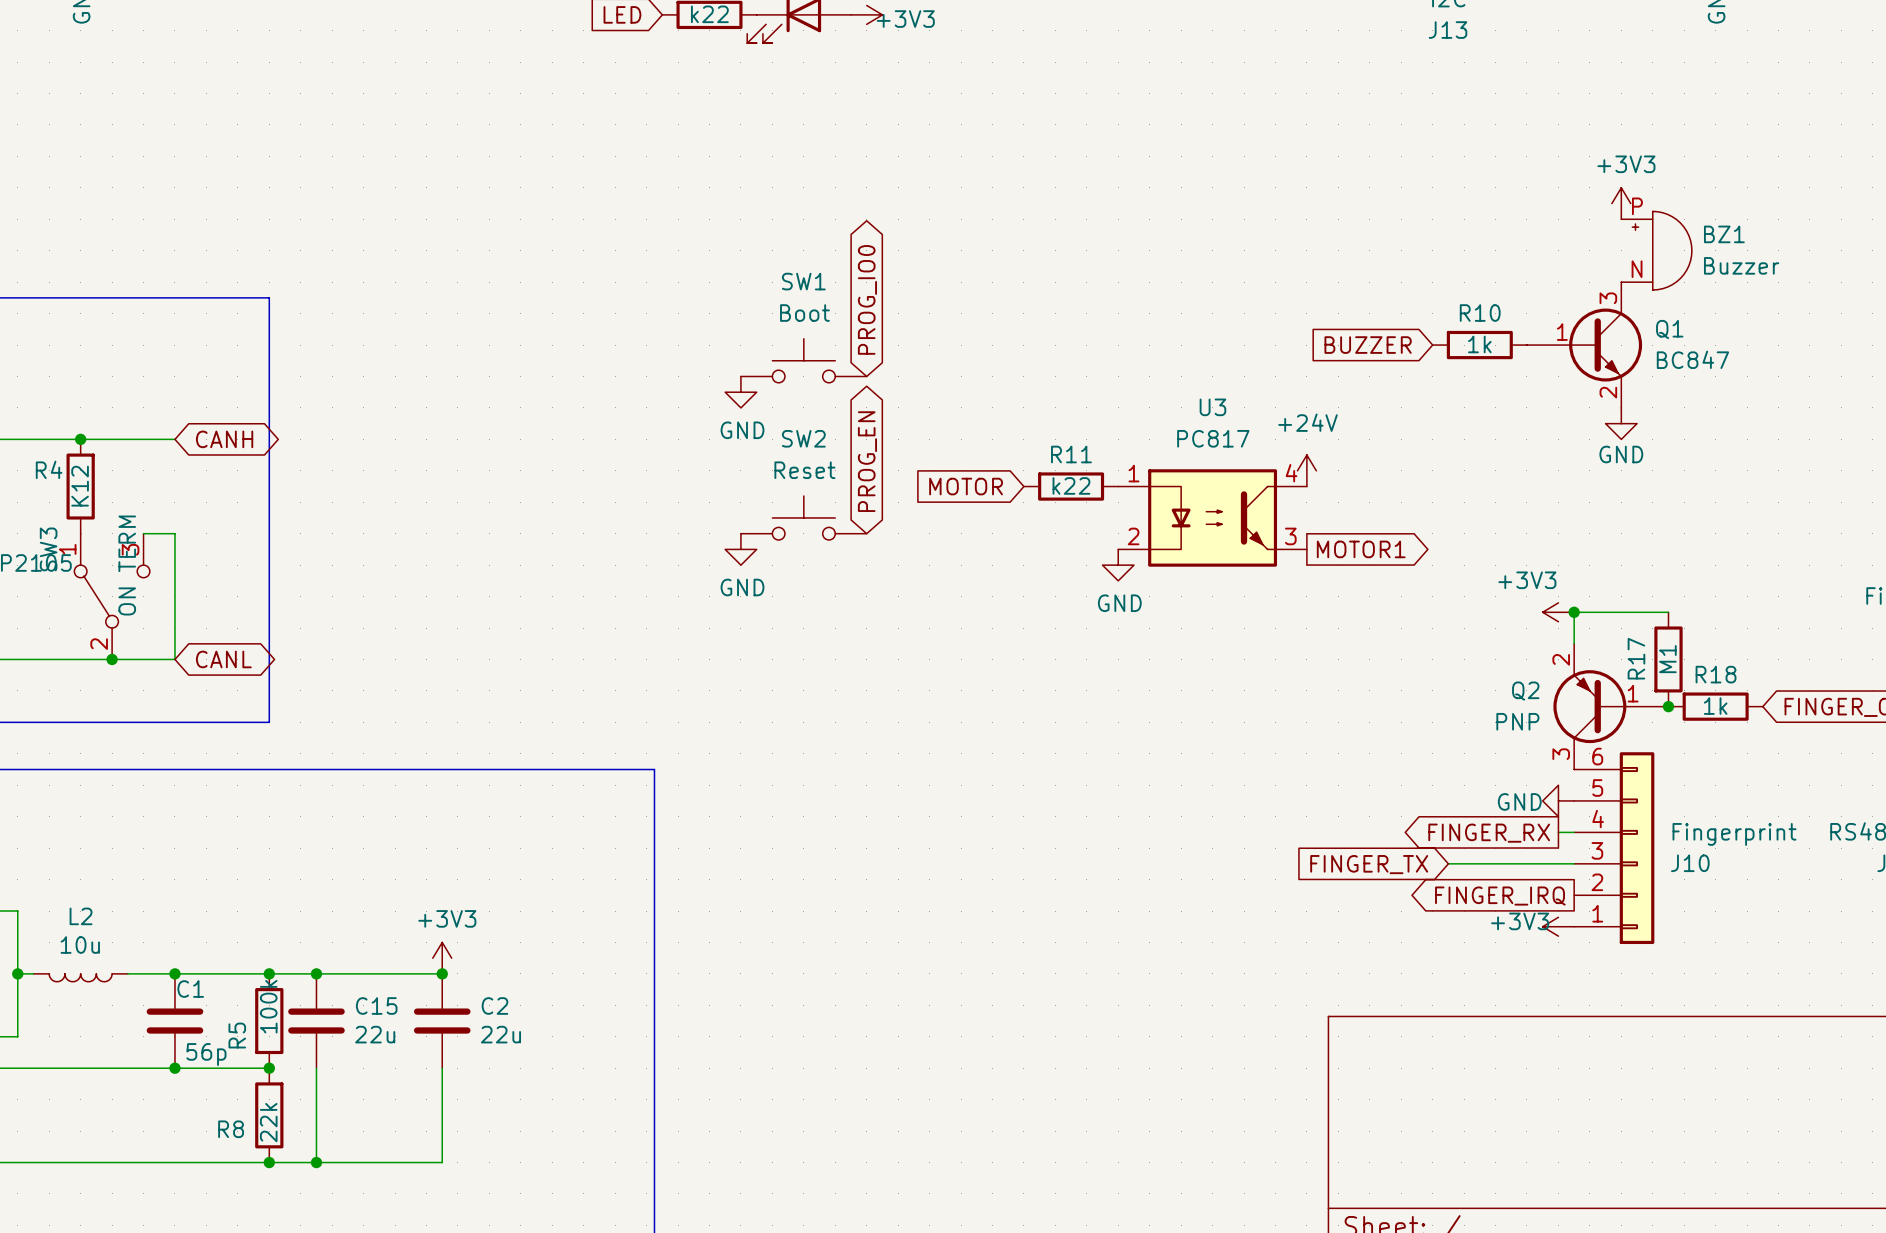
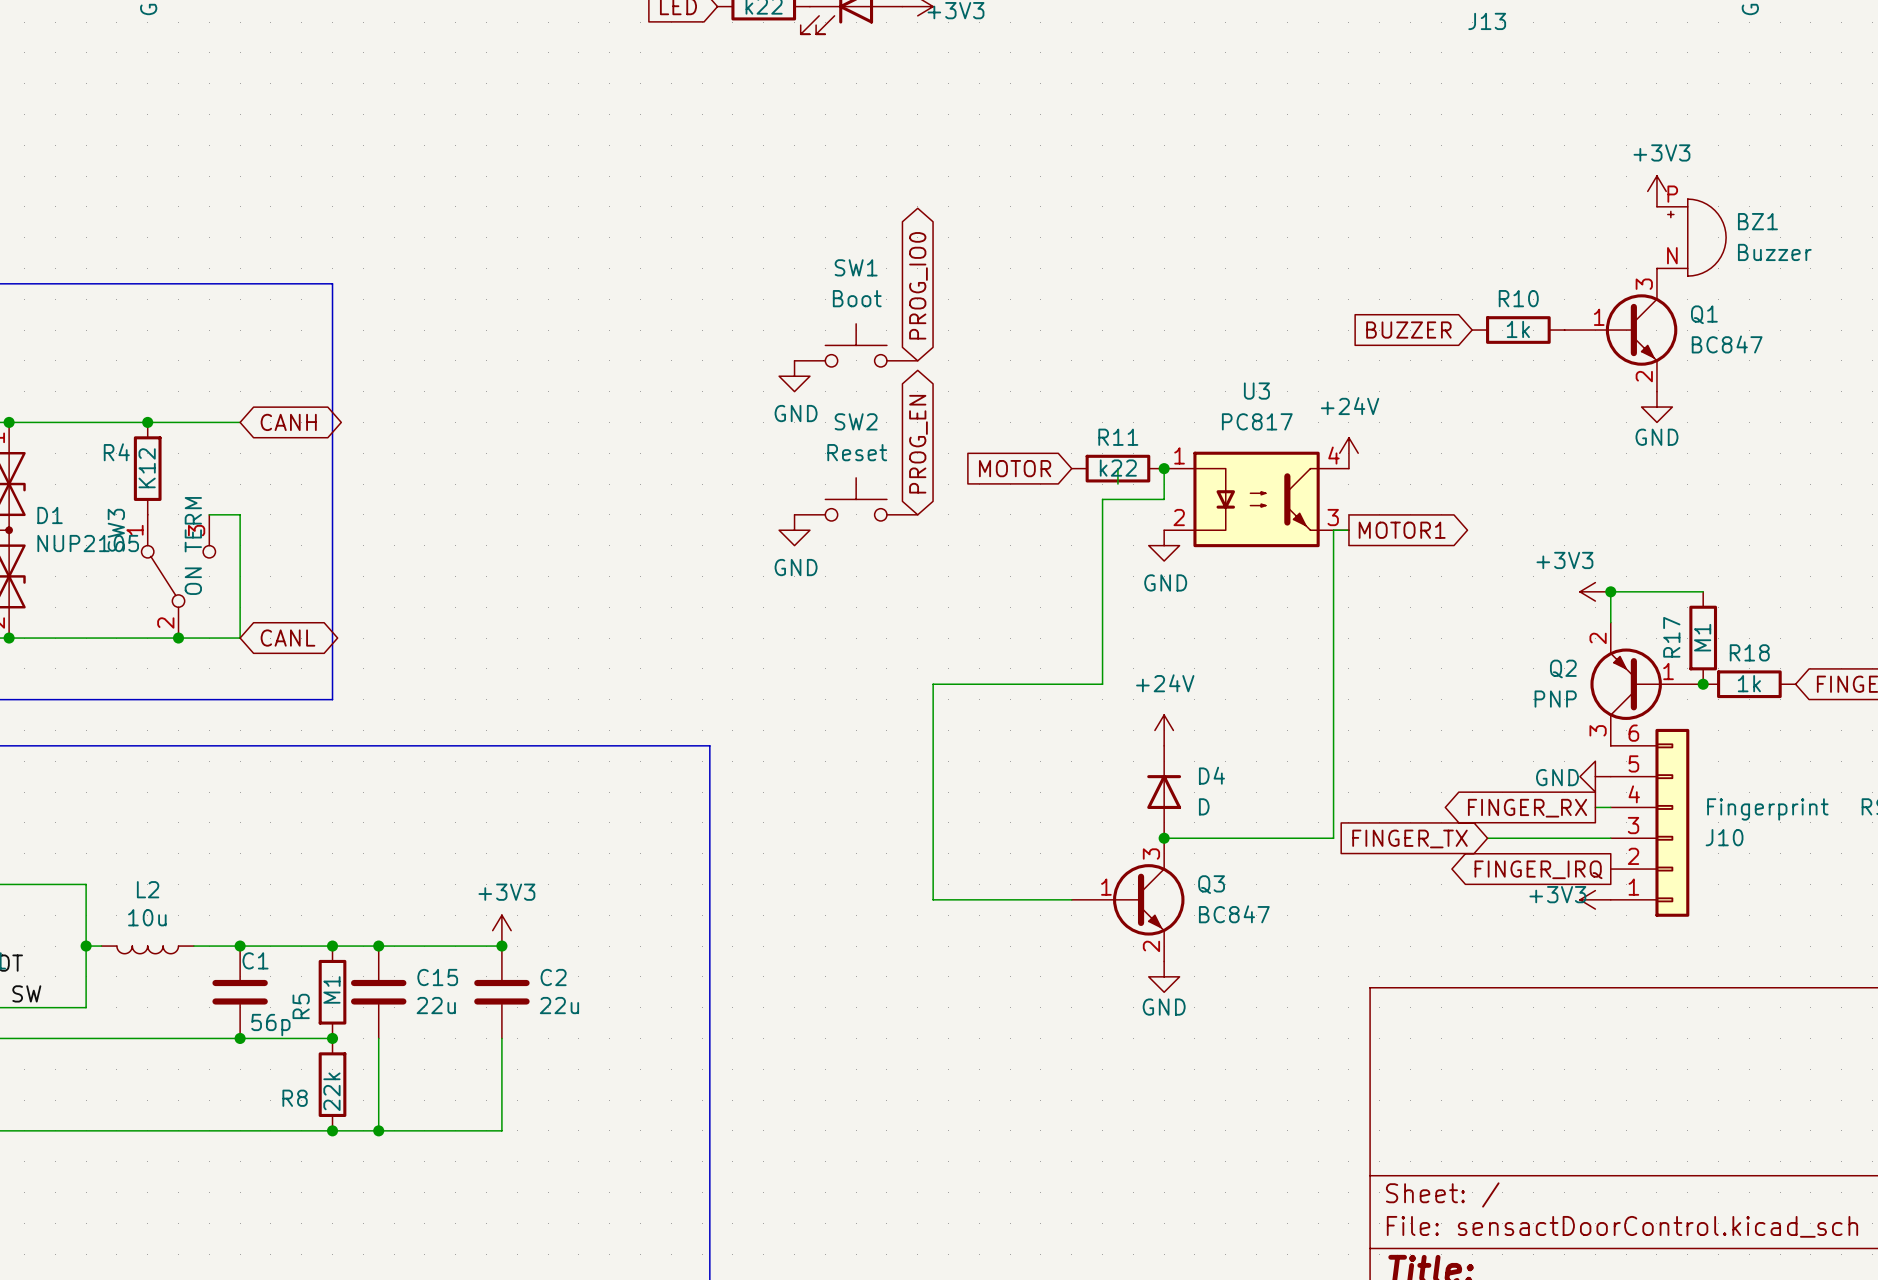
wire: none -> (1117, 468) (1117, 484)
wire: none -> (1164, 468) (1164, 499) (1102, 499) (1102, 684) (933, 684) (933, 899) (1071, 899)
junction: none -> (1164, 468)
wire: none -> (1348, 530) (1333, 530) (1333, 838) (1164, 838)
power symbol: none -> +24V (1164, 730)
D4: none -> D (1164, 792)
junction: none -> (1164, 838)
Q3: none -> BC847 (1128, 899)
power symbol: none -> GND (1164, 976)
R5 value: 100k (268, 1006) -> M1 (331, 989)

